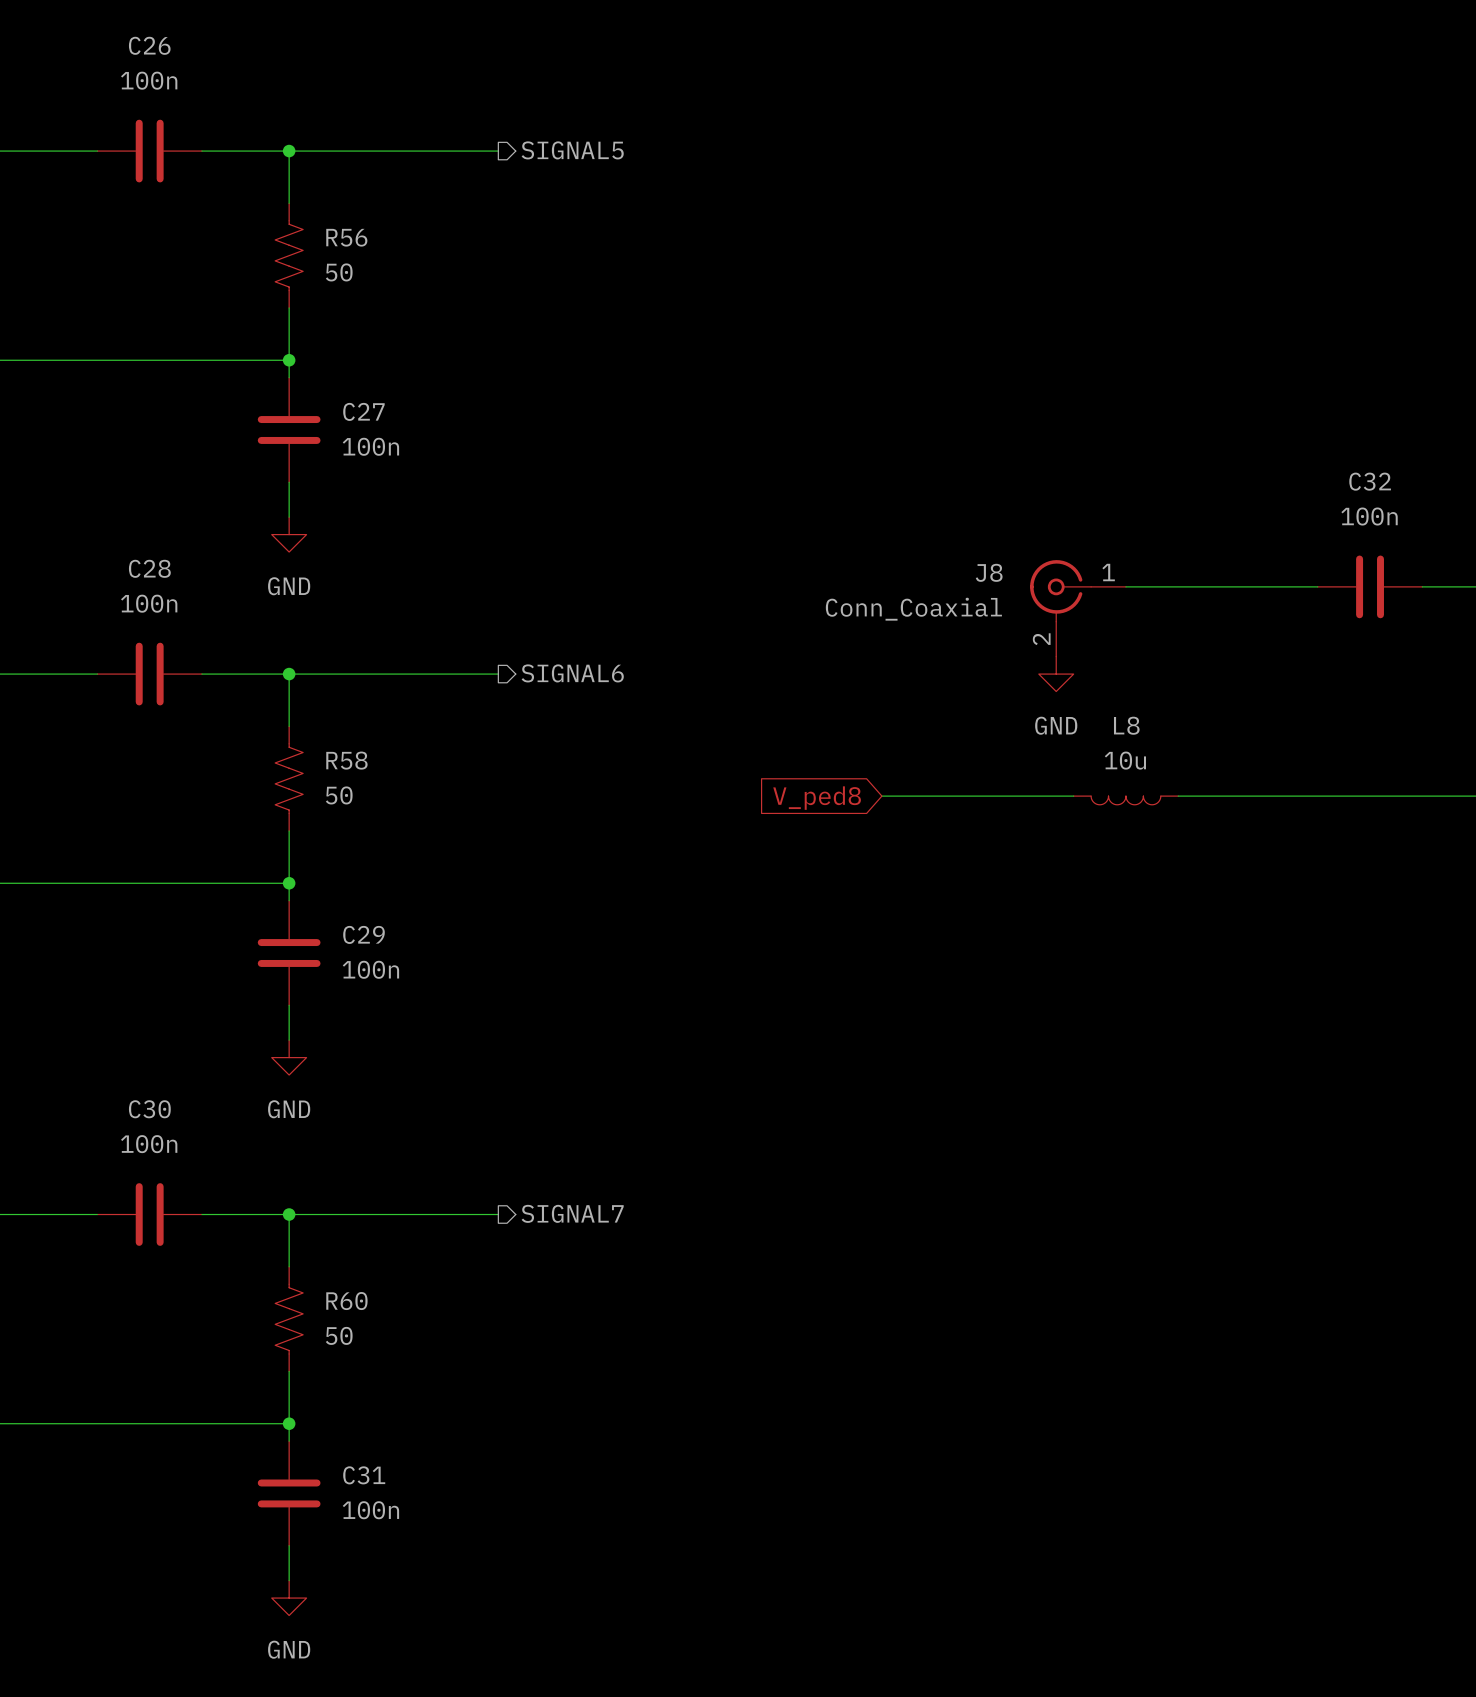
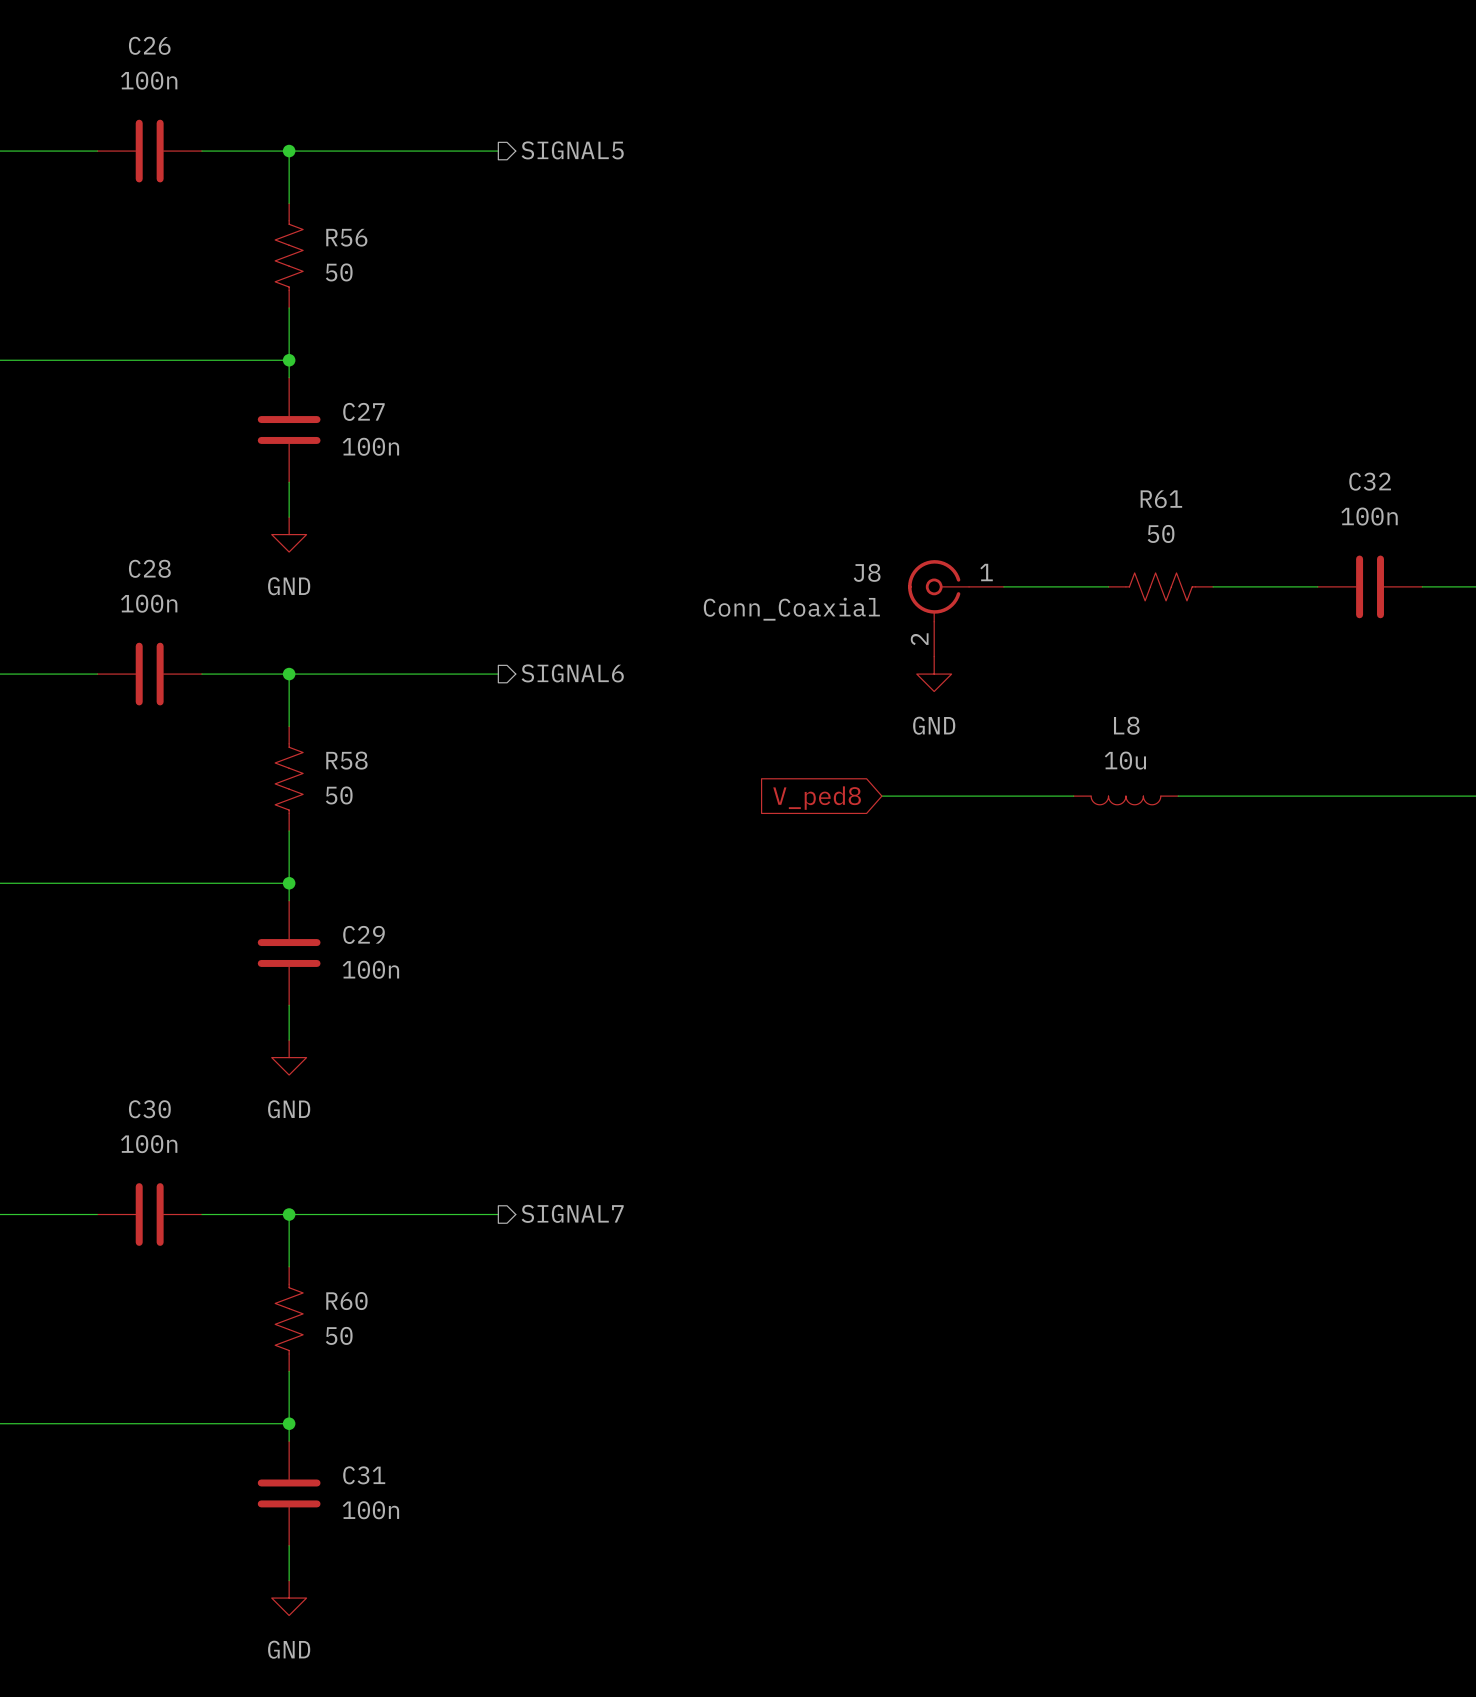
wire: none -> (1003, 586) (1108, 586)
wire: (1125, 586) (1213, 586) -> none
R61: none -> 50 (1160, 586)
J8 position: (1078, 608) -> (955, 608)
power symbol position: GND (1056, 674) -> GND (934, 674)

